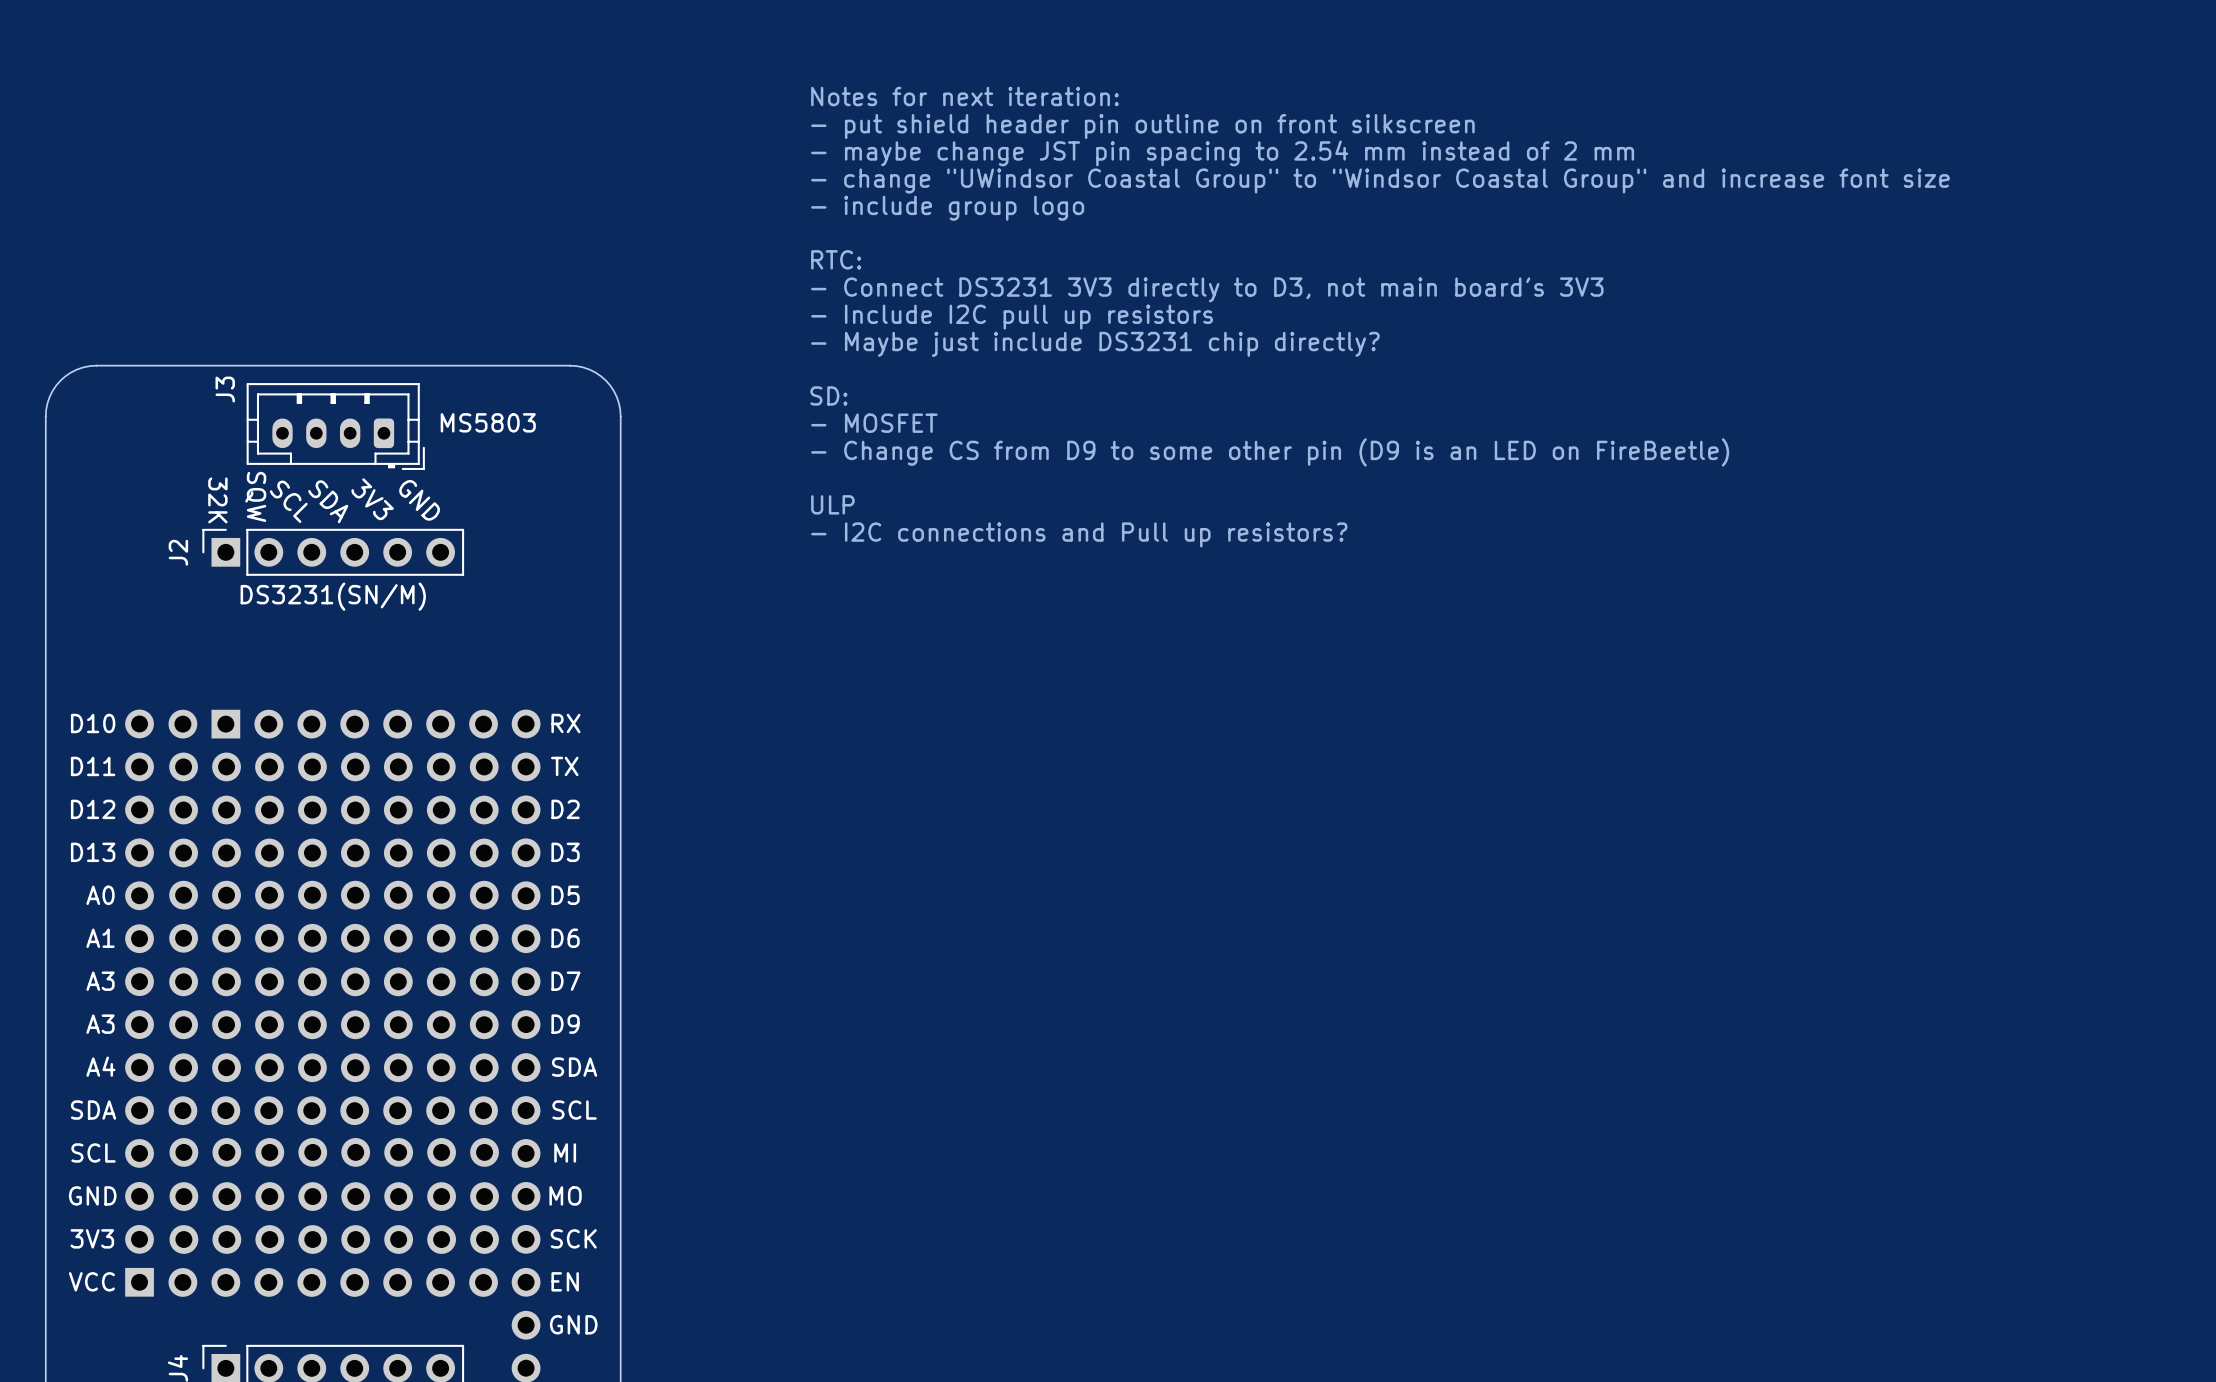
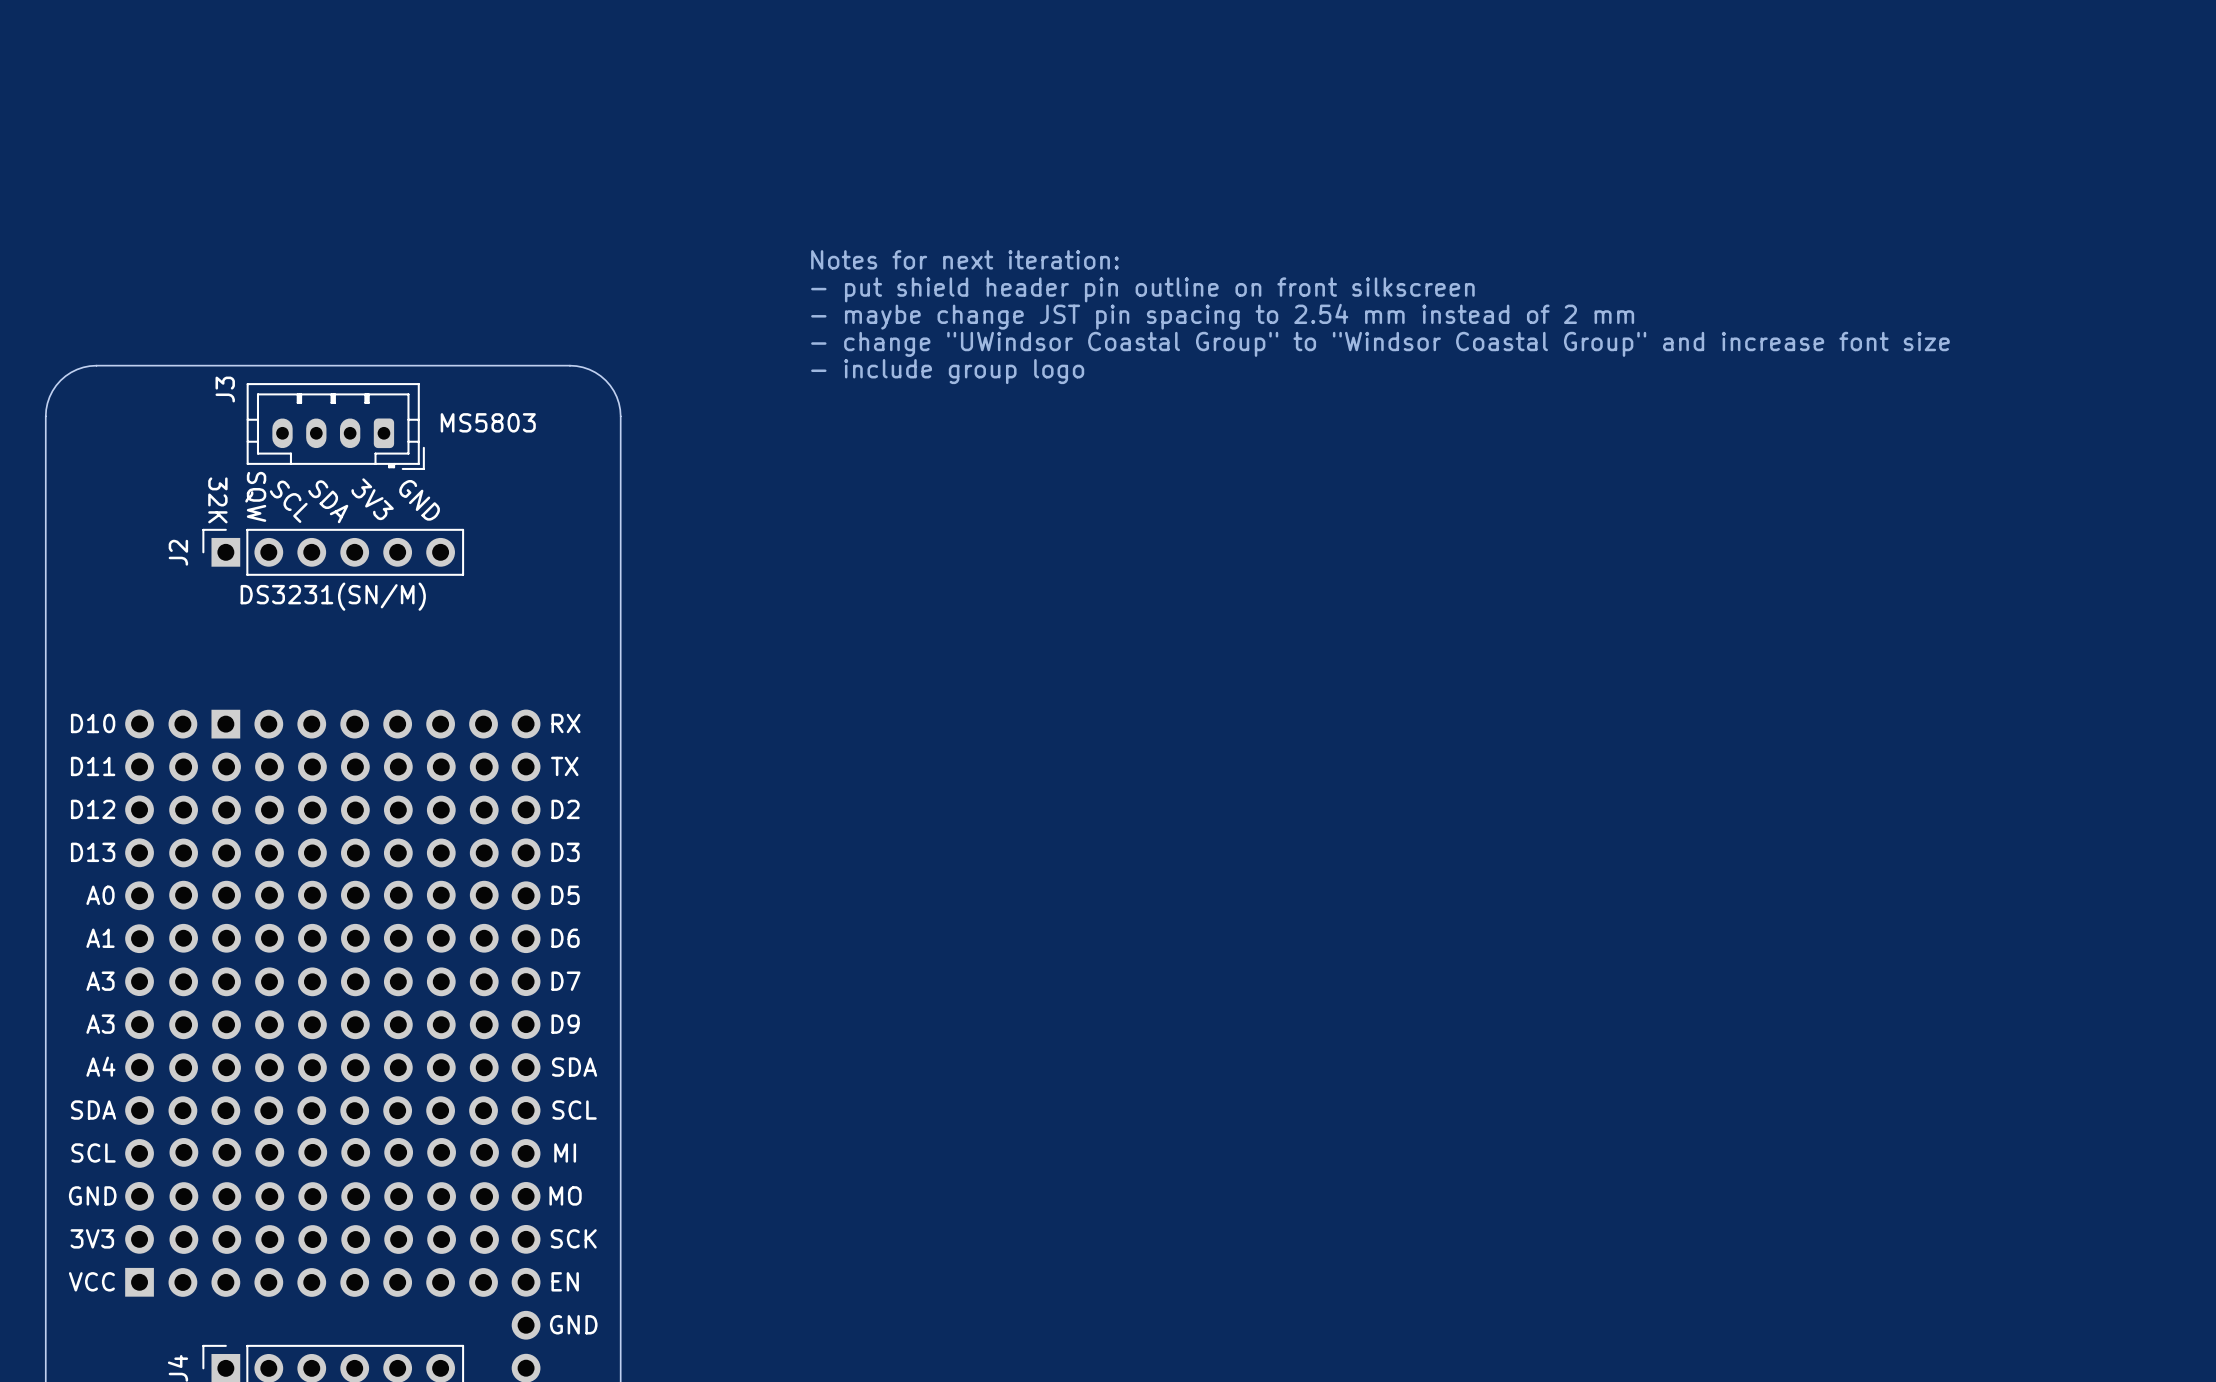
text: Notes for next iteration: (964, 96) -> none
text: - put shield header pin outline on front silkscreen (1142, 126) -> none
text: - maybe change JST pin spacing to 2.54 mm instead of 2 mm (1222, 153) -> none
text: - change "UWindsor Coastal Group" to "Windsor Coastal Group" and increase font size (1380, 180) -> none
text position: - include group logo (947, 208) -> - include group logo (947, 371)
text: RTC: (836, 259) -> Notes for next iteration: (964, 259)
text: - Connect DS3231 3V3 directly to D3, not main board's 3V3 (1207, 289) -> - put shield header pin outline on front silkscreen (1142, 289)
text: - Include I2C pull up resistors (1012, 317) -> - maybe change JST pin spacing to 2.54 mm instead of 2 mm (1222, 316)
text: - Maybe just include DS3231 chip directly? (1095, 344) -> - change "UWindsor Coastal Group" to "Windsor Coastal Group" and increase font size (1380, 344)
text: SD: (828, 395) -> none
text: - MOSFET (874, 423) -> none
text: - Change CS from D9 to some other pin (D9 is an LED on FireBeetle) (1270, 452) -> none
text: ULP (832, 504) -> none
text: - I2C connections and Pull up resistors? (1079, 534) -> none

